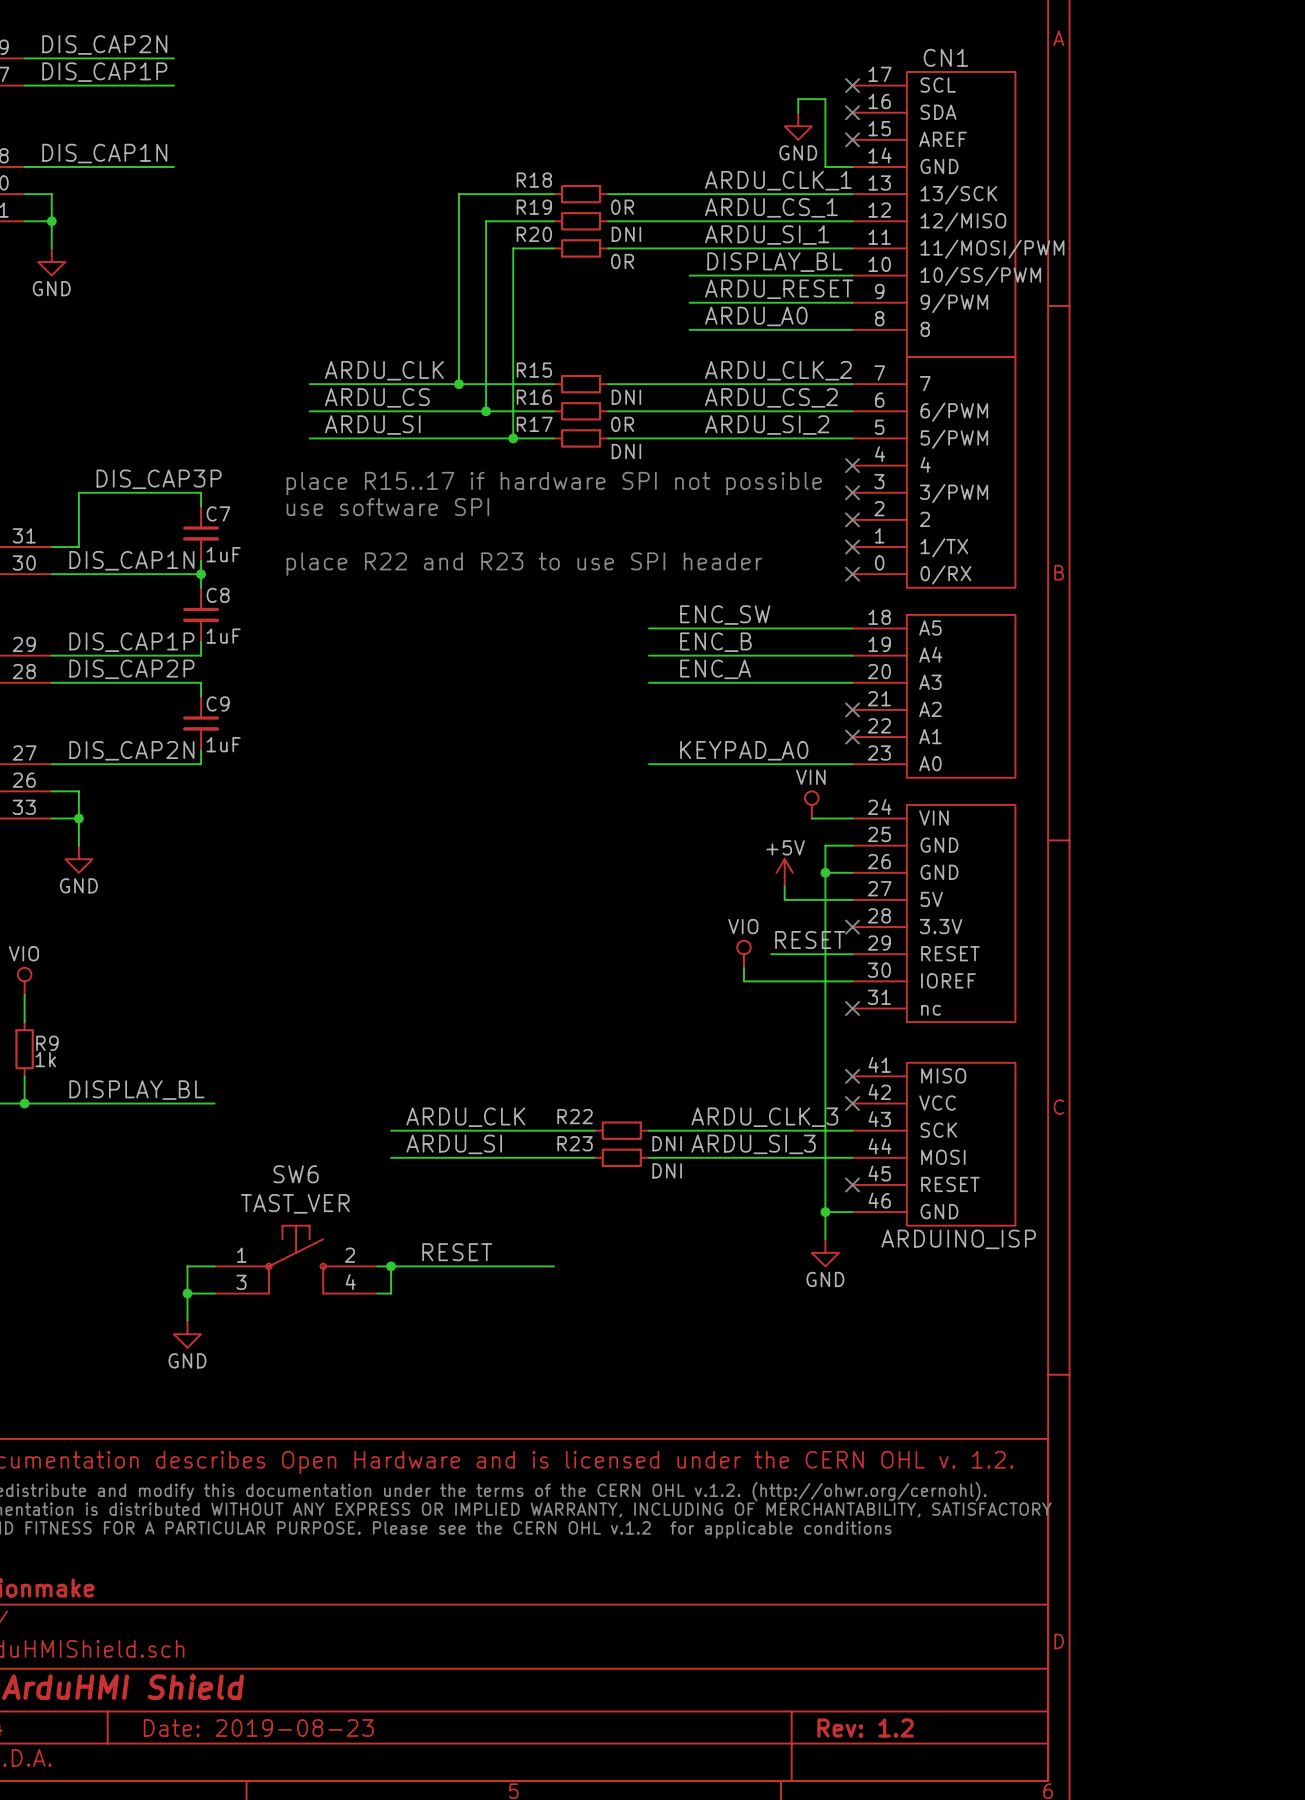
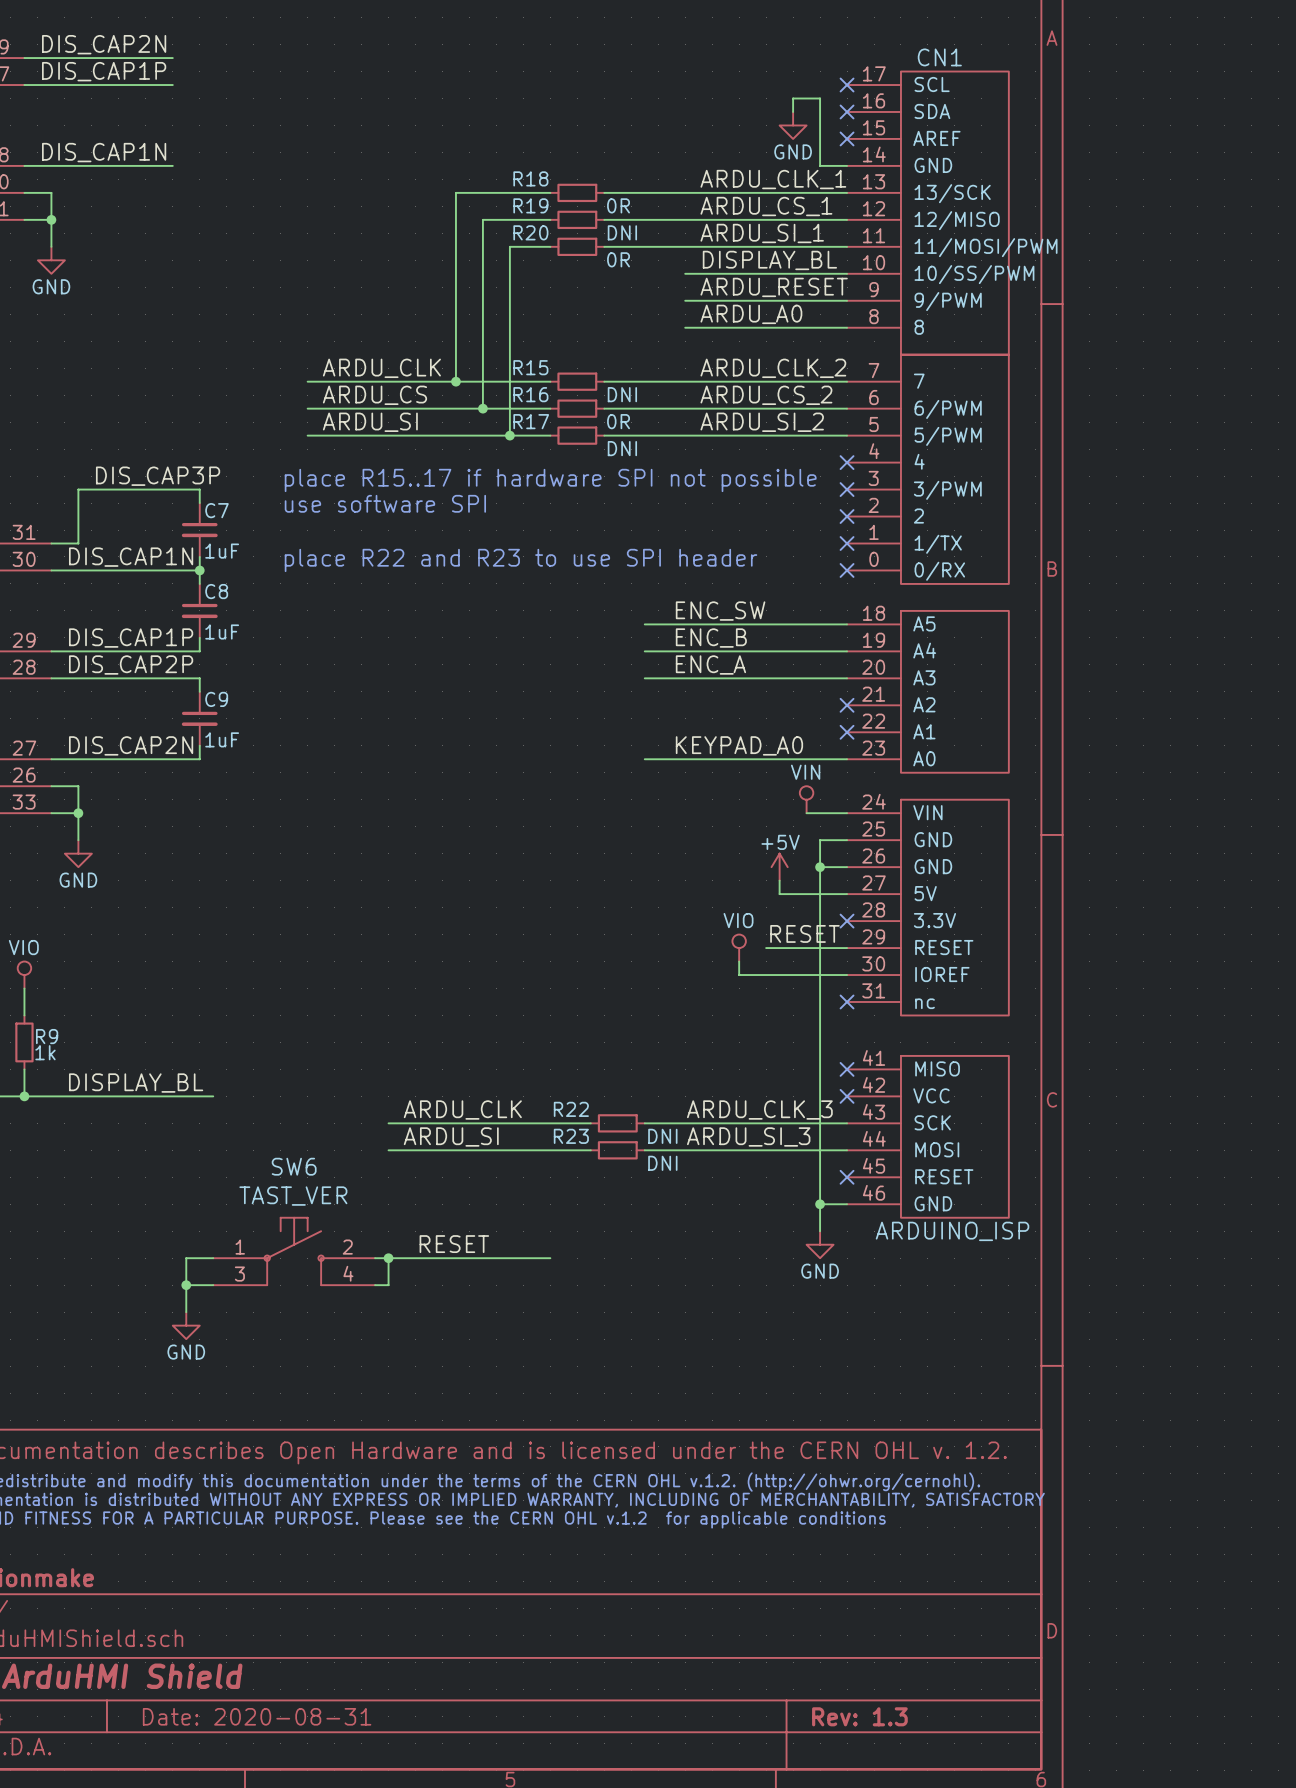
title block: Date: 2019-08-23 (258, 1727) -> Date: 2020-08-31 (257, 1716)
title block: Rev: 1.2 (865, 1727) -> Rev: 1.3 (859, 1716)

